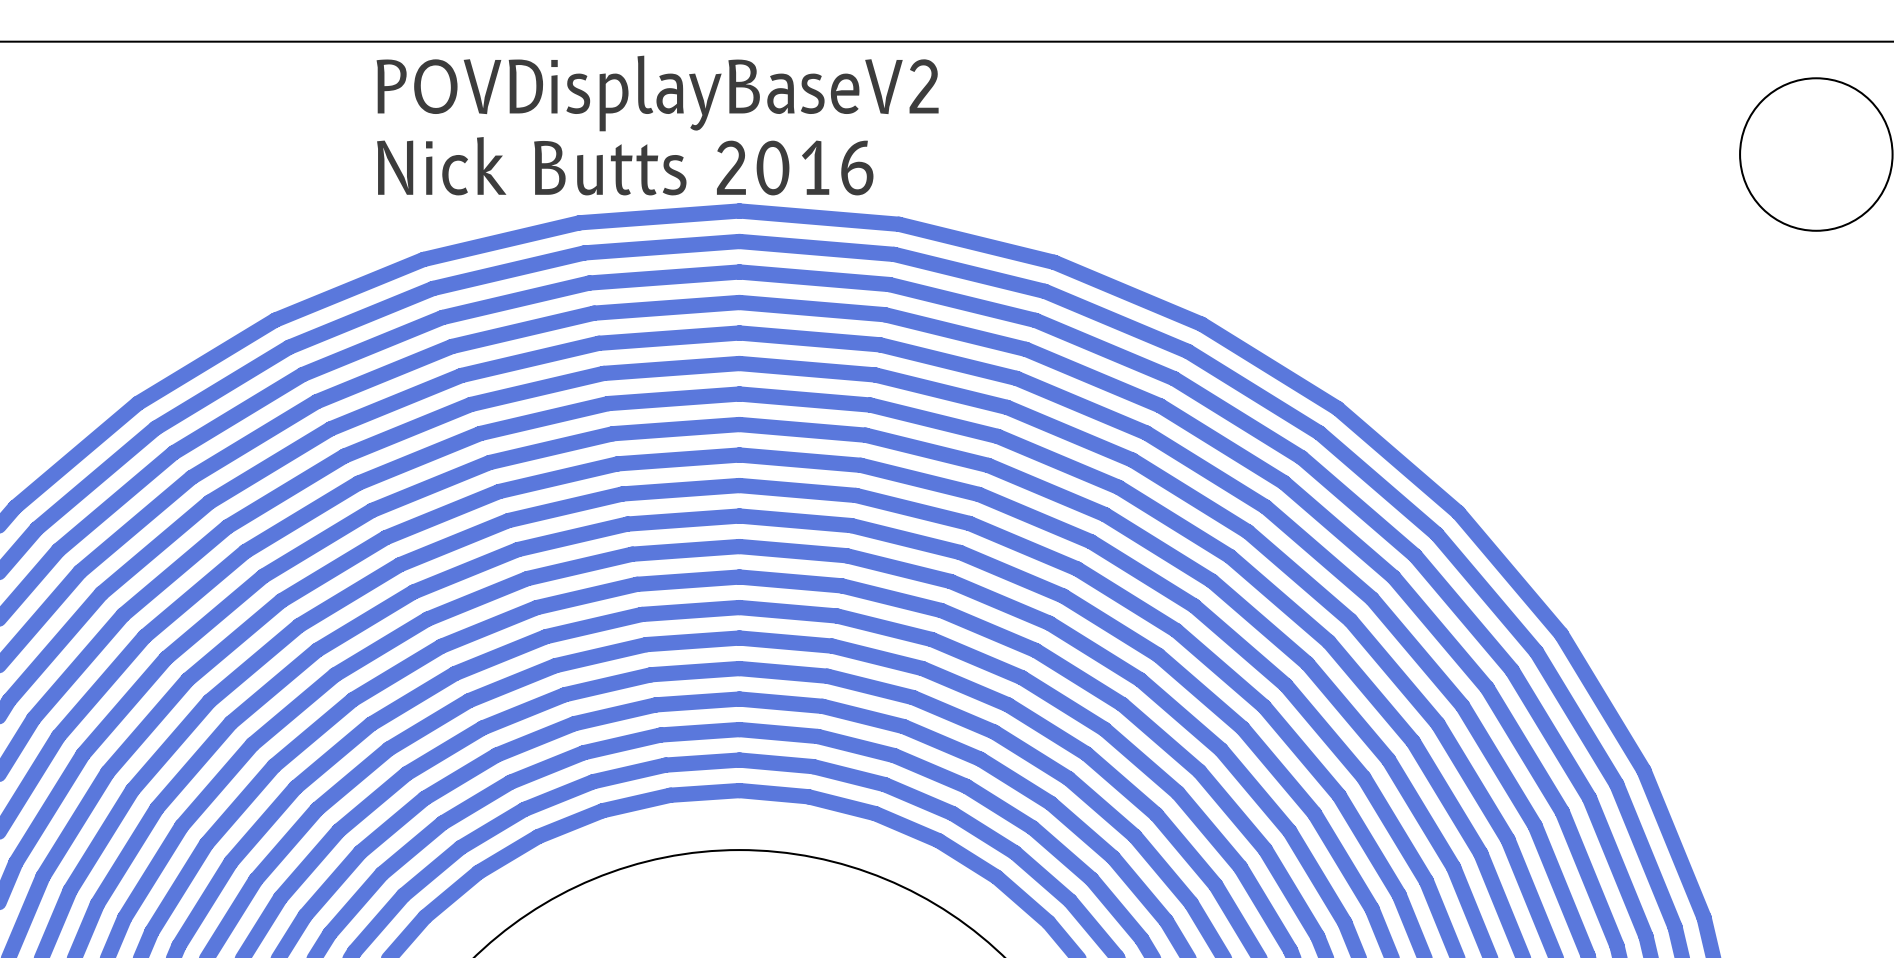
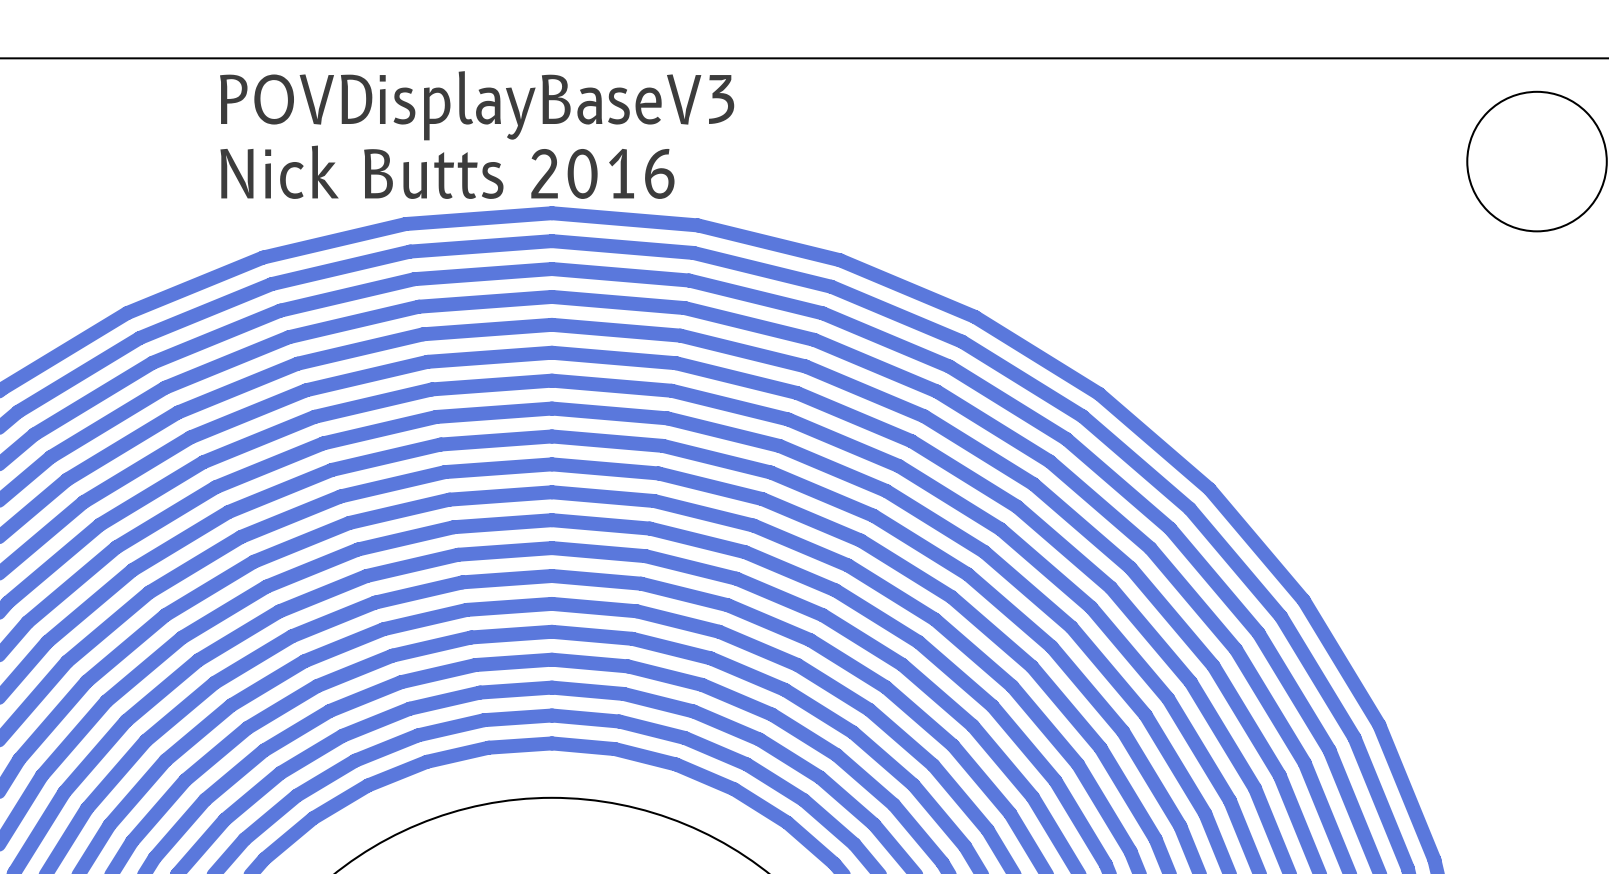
text: POVDisplayBaseV2 (657, 93) -> POVDisplayBaseV3 (477, 105)

